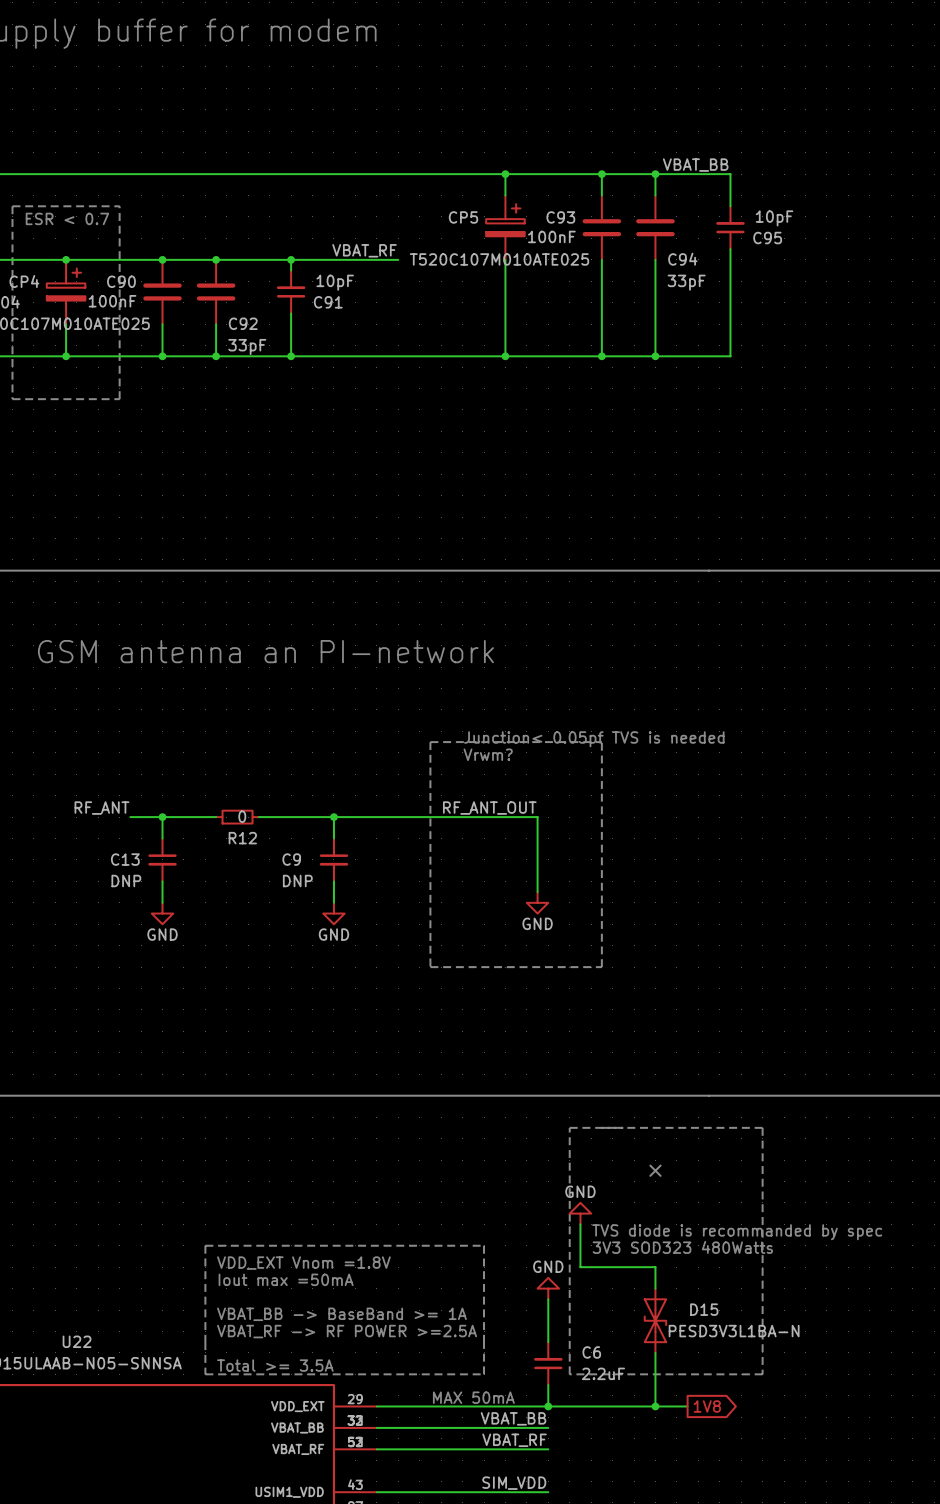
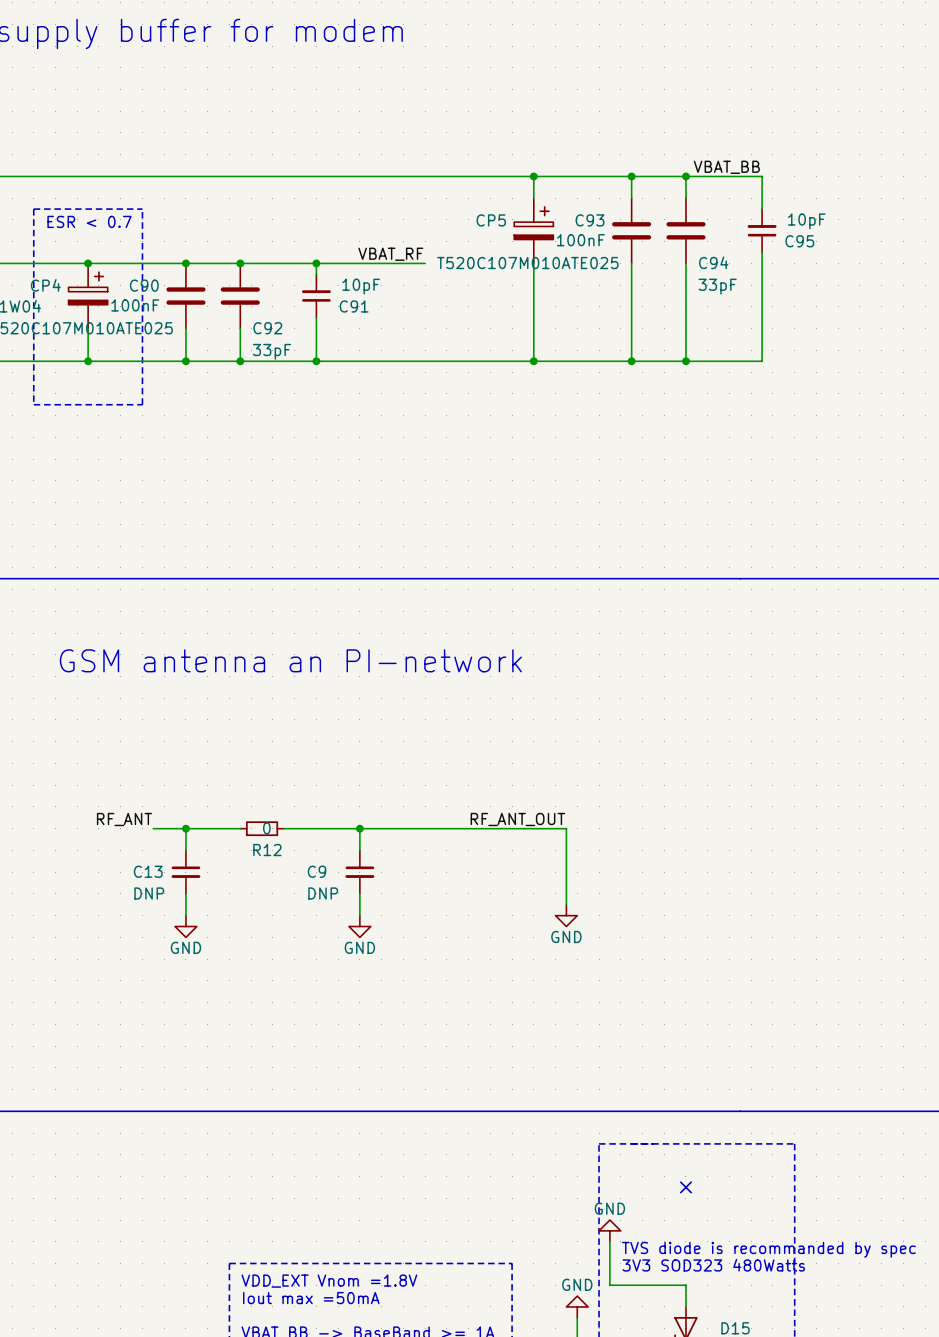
text: Junction< 0.05pf TVS is needed (594, 739) -> none
line: (430, 742) (601, 742) (601, 967) (430, 967) (430, 742) -> none
text: Vrwm? (488, 754) -> none

